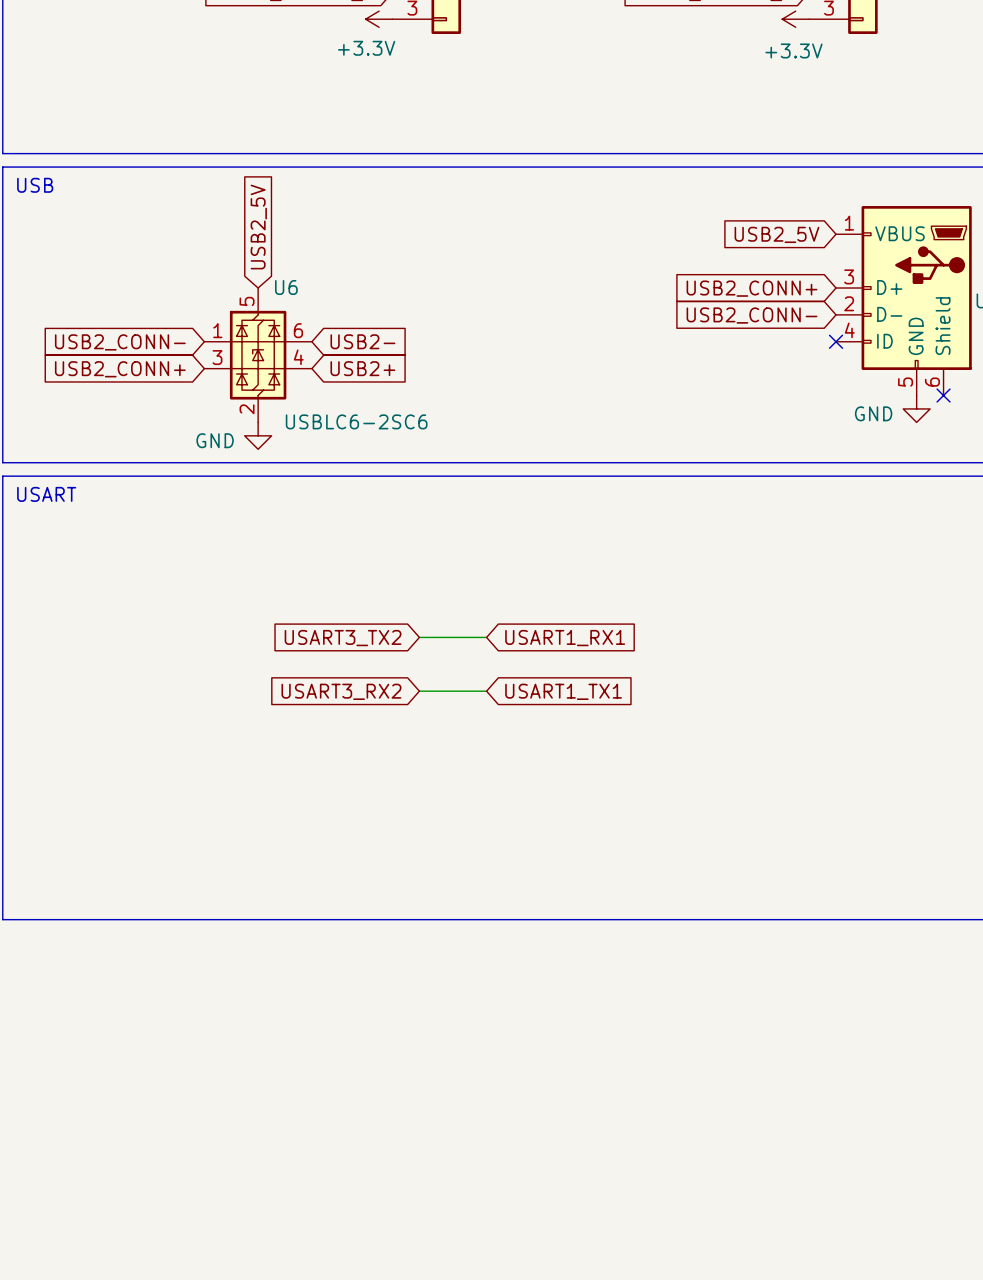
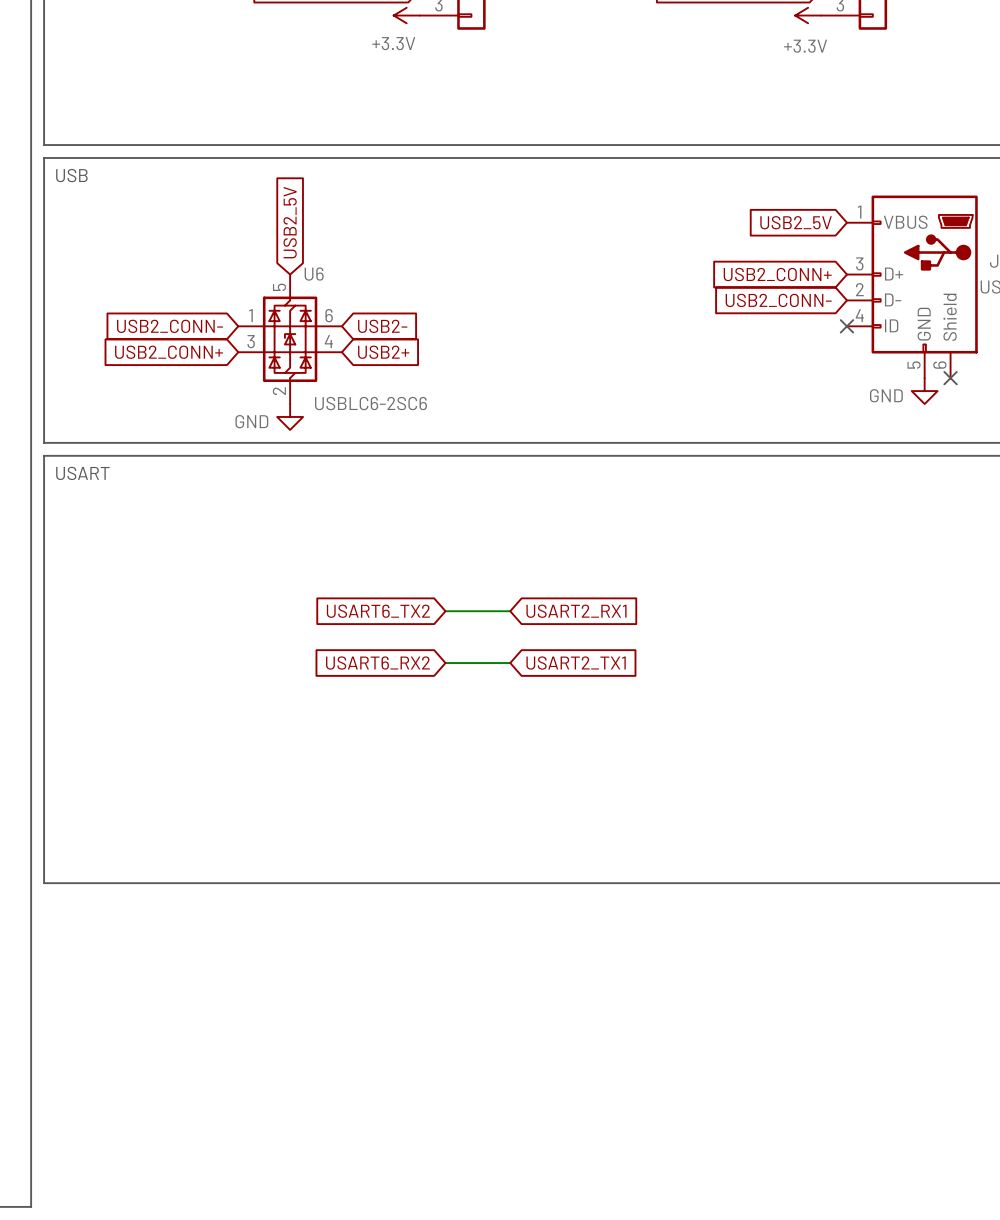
global label: USART3_TX2 (343, 638) -> USART6_TX2 (378, 611)
global label: USART1_RX1 (565, 638) -> USART2_RX1 (576, 611)
global label: USART3_RX2 (341, 691) -> USART6_RX2 (377, 663)
global label: USART1_TX1 (563, 691) -> USART2_TX1 (576, 663)

